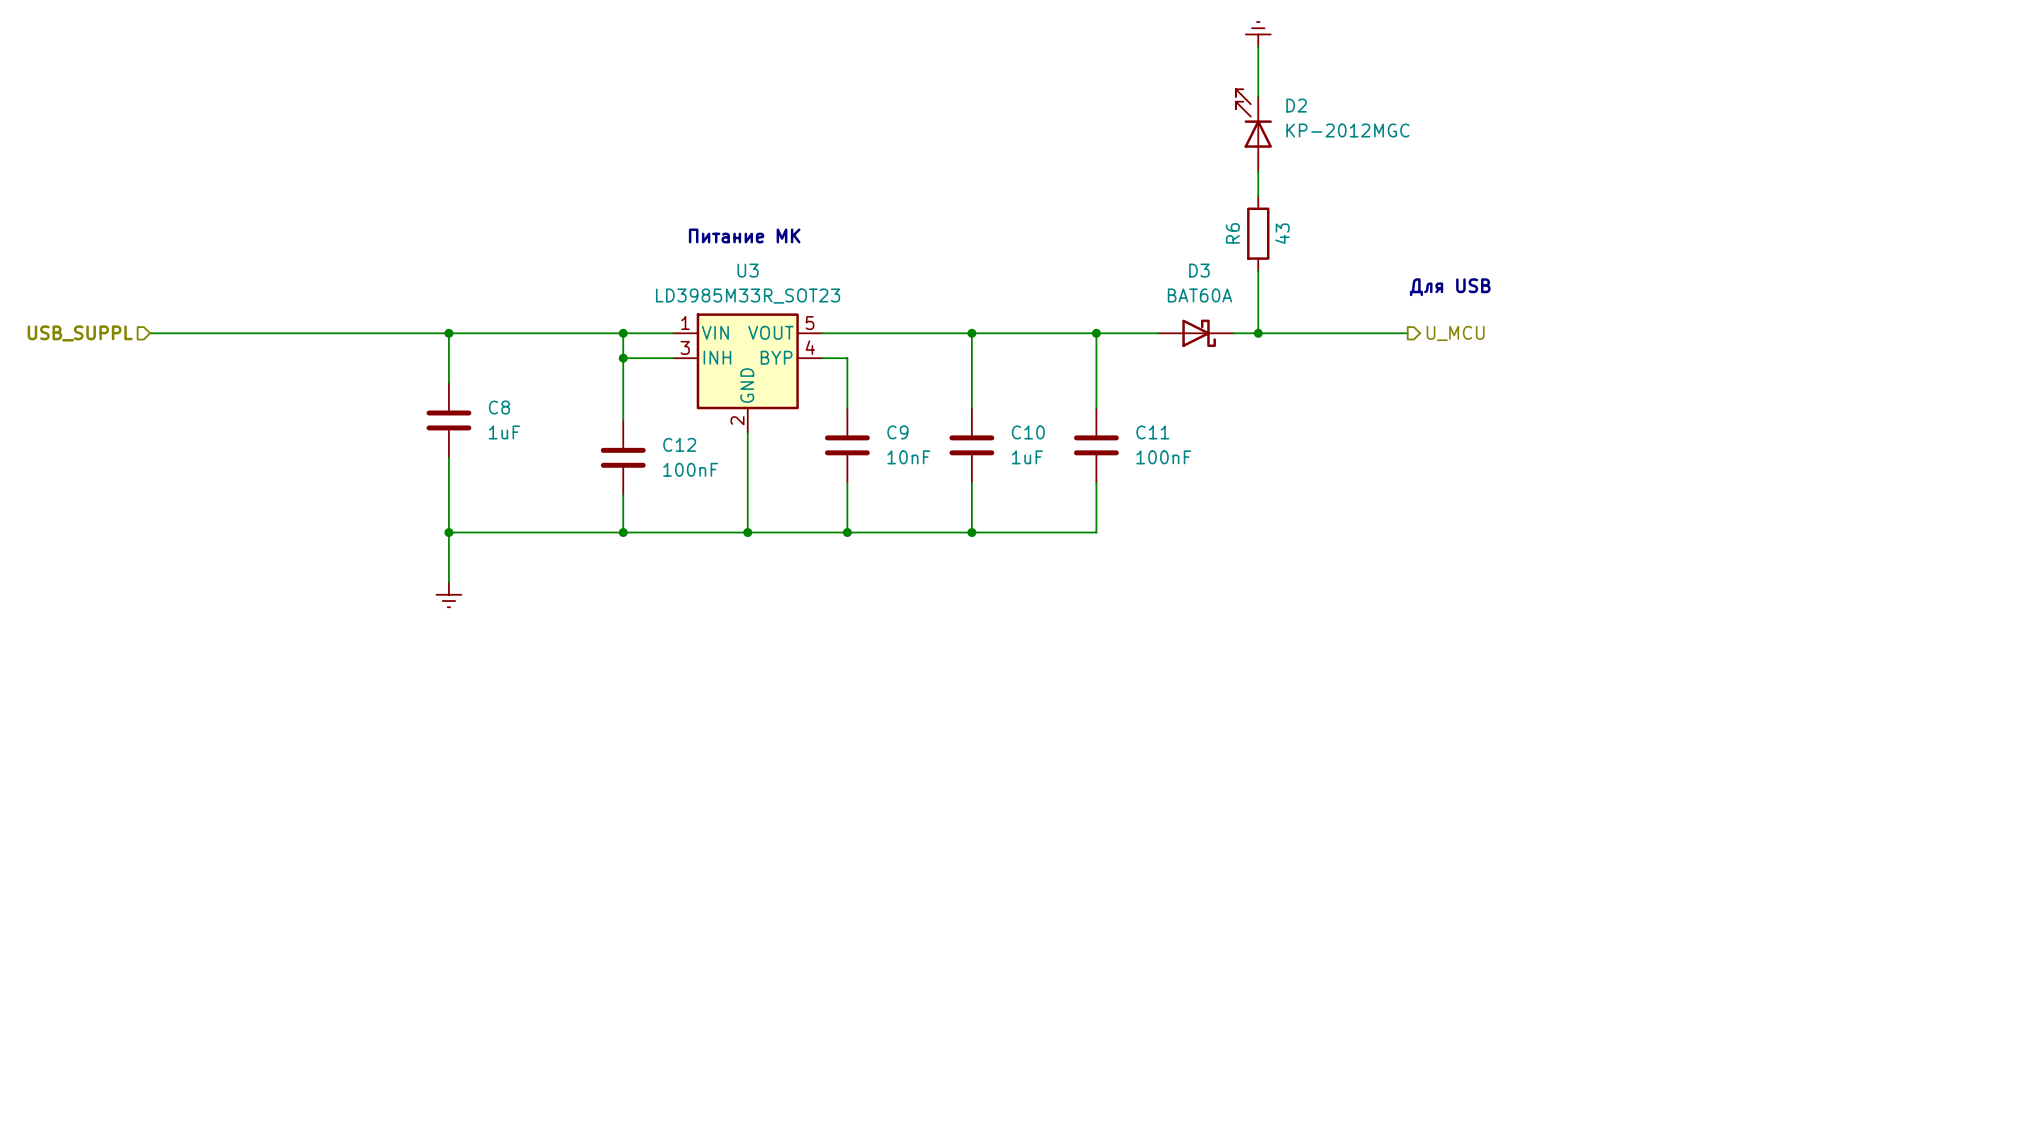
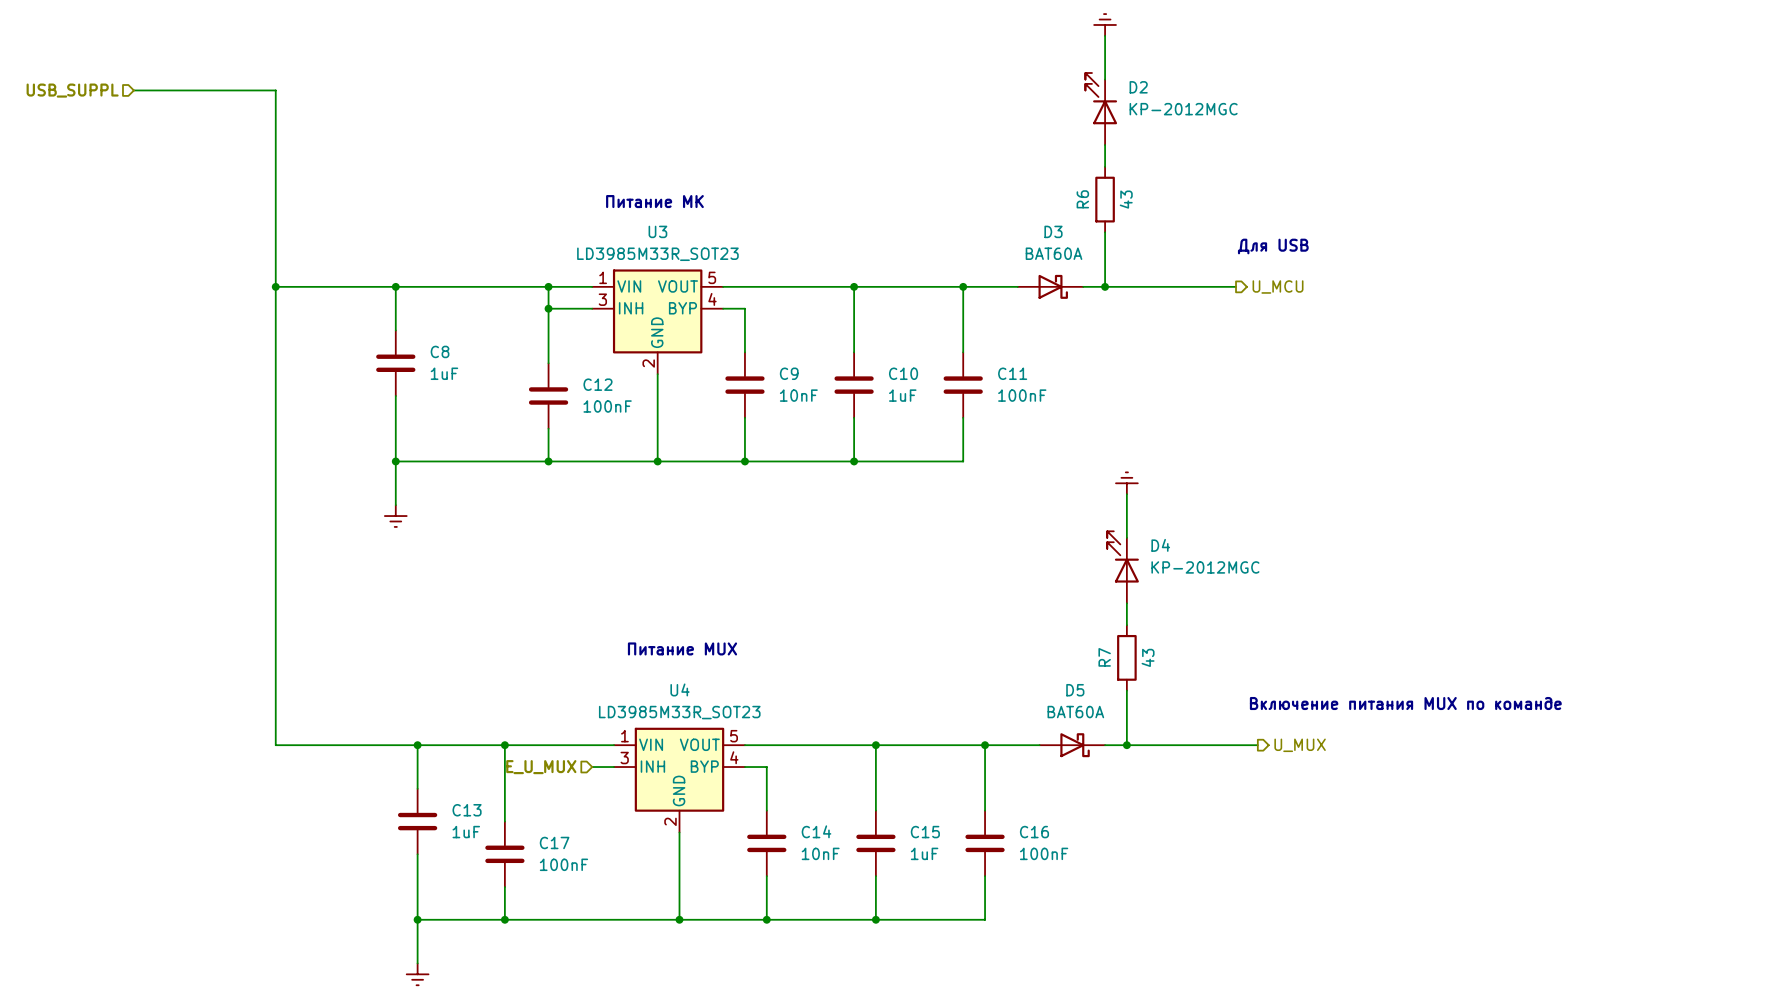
wire: none -> (133, 90) (275, 90) (275, 745) (614, 745)
hierarchical label position: USB_SUPPL (80, 333) -> USB_SUPPL (72, 90)
wire: (150, 333) (311, 333) -> none
junction: none -> (275, 286)
power symbol: none -> (1126, 483)
wire: none -> (1126, 494) (1126, 537)
D4: none -> KP-2012MGC (1123, 567)
wire: none -> (1126, 603) (1126, 625)
text: none -> Питание МUX (682, 648)
R7: none -> 43 (1126, 657)
wire: none -> (1126, 690) (1126, 745)
text: none -> Включение питания MUX по команде (1405, 703)
wire: none -> (417, 745) (417, 788)
junction: none -> (417, 745)
wire: none -> (504, 745) (504, 821)
junction: none -> (504, 745)
wire: none -> (744, 745) (1039, 745)
wire: none -> (875, 745) (875, 810)
junction: none -> (875, 745)
wire: none -> (985, 745) (985, 810)
junction: none -> (985, 745)
D5: none -> BAT60A (1072, 745)
wire: none -> (1105, 745) (1257, 745)
junction: none -> (1126, 745)
hierarchical label: none -> U_MUX (1300, 745)
hierarchical label: none -> E_U_MUX (541, 767)
wire: none -> (592, 767) (614, 767)
wire: none -> (744, 767) (766, 767) (766, 810)
U4: none -> LD3985M33R_SOT23 (679, 780)
C13: none -> 1uF (417, 821)
wire: none -> (679, 832) (679, 919)
C14: none -> 10nF (766, 843)
C15: none -> 1uF (875, 843)
C16: none -> 100nF (985, 843)
wire: none -> (417, 854) (417, 963)
C17: none -> 100nF (504, 854)
wire: none -> (766, 876) (766, 919)
wire: none -> (875, 876) (875, 919)
wire: none -> (985, 876) (985, 919) (417, 919)
wire: none -> (504, 887) (504, 919)
junction: none -> (417, 919)
junction: none -> (504, 919)
junction: none -> (679, 919)
junction: none -> (766, 919)
junction: none -> (875, 919)
power symbol: none -> (417, 974)

